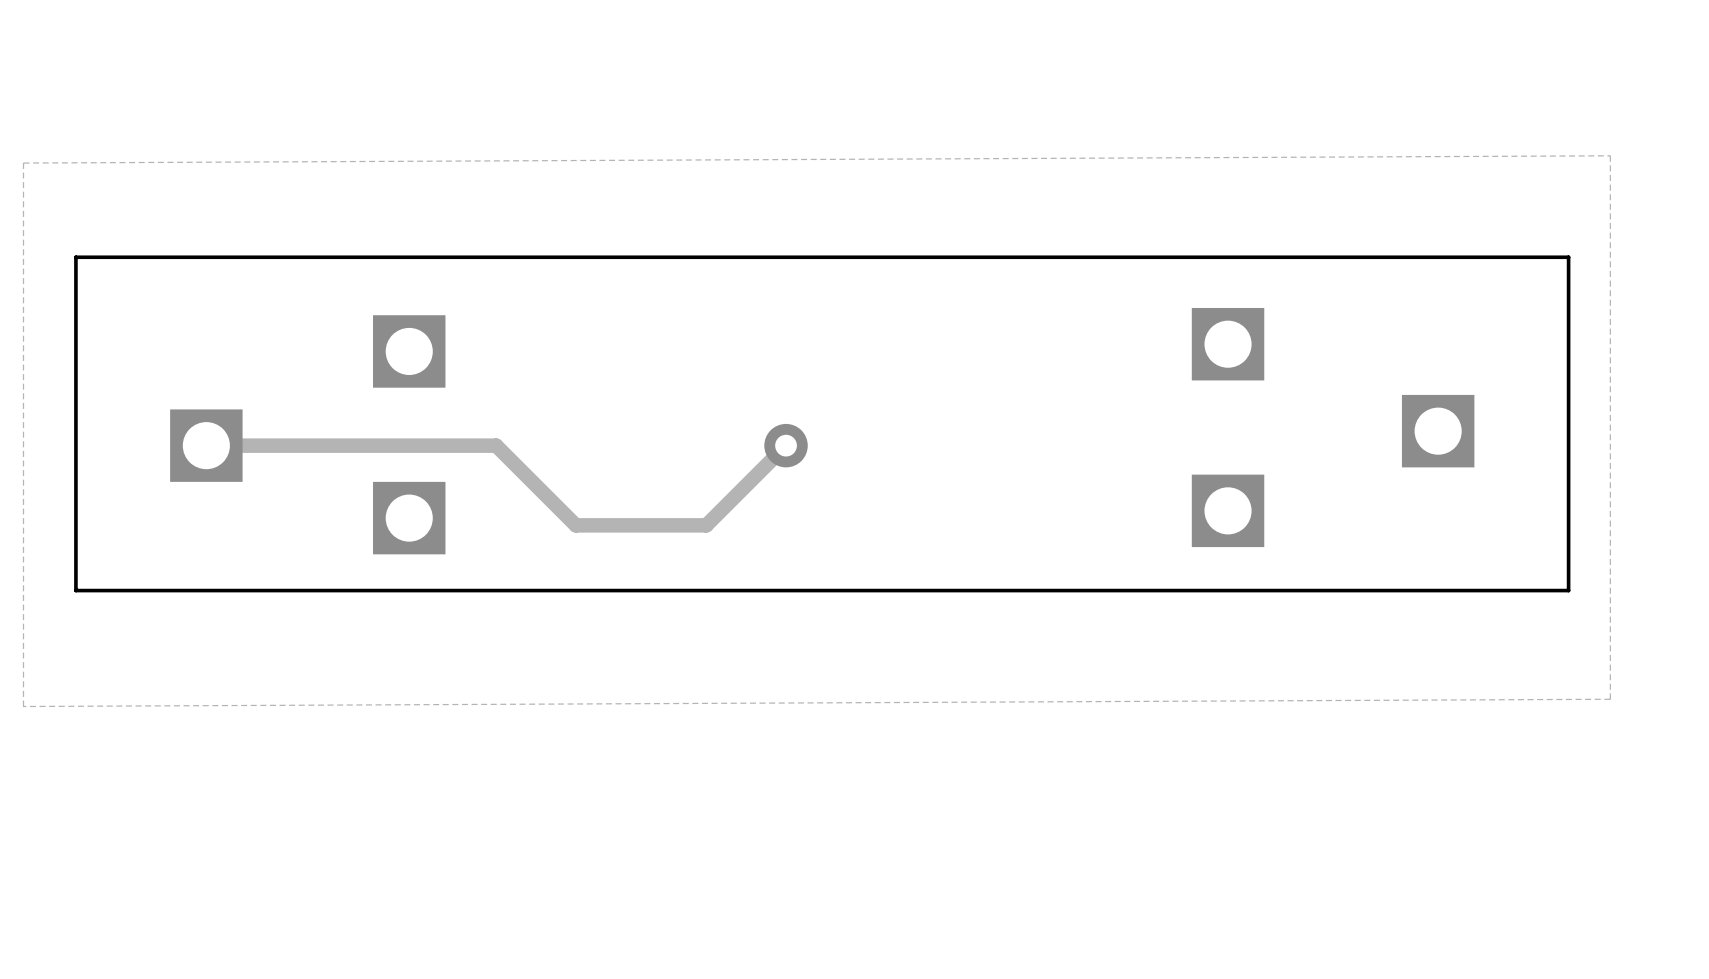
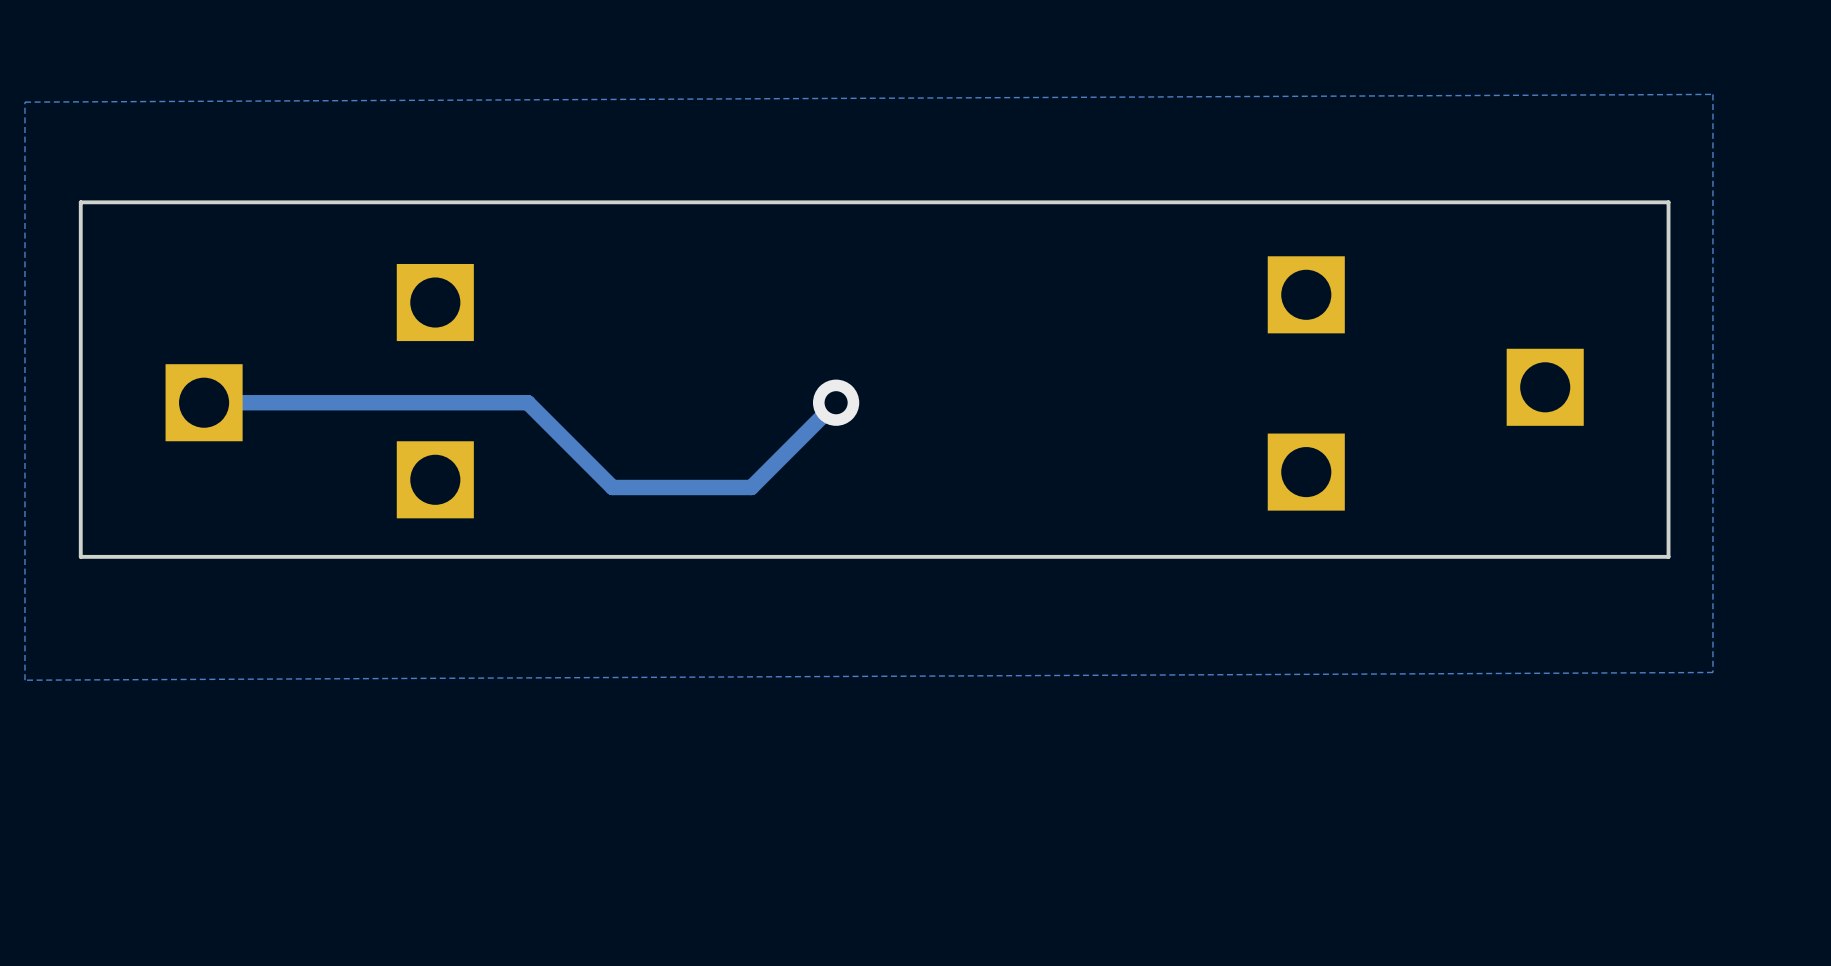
part position: (1438, 431) -> (1545, 387)
part position: (206, 445) -> (204, 402)

